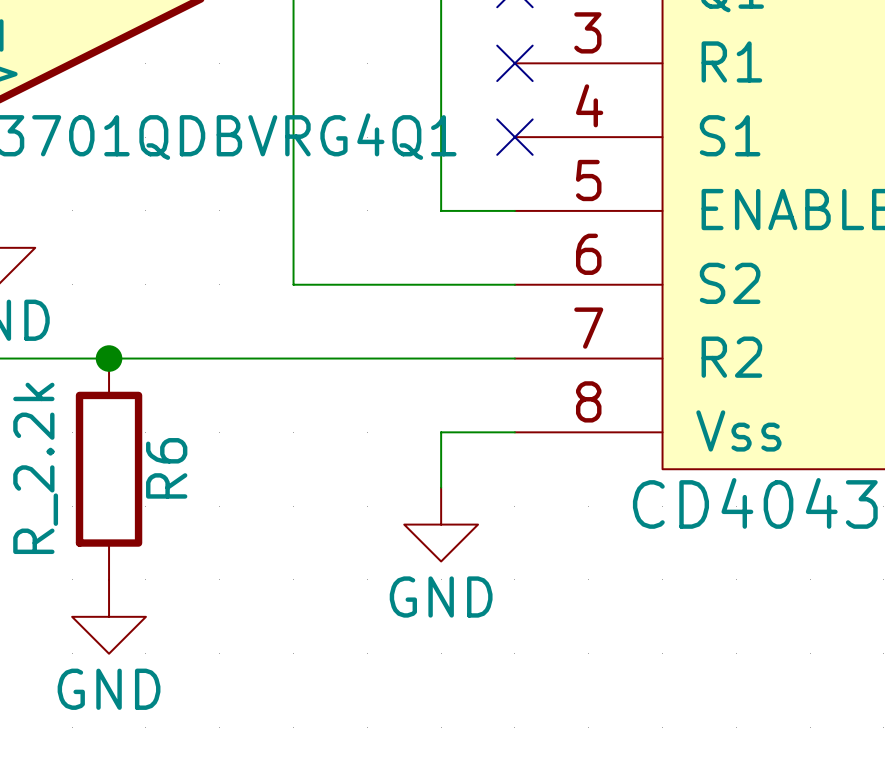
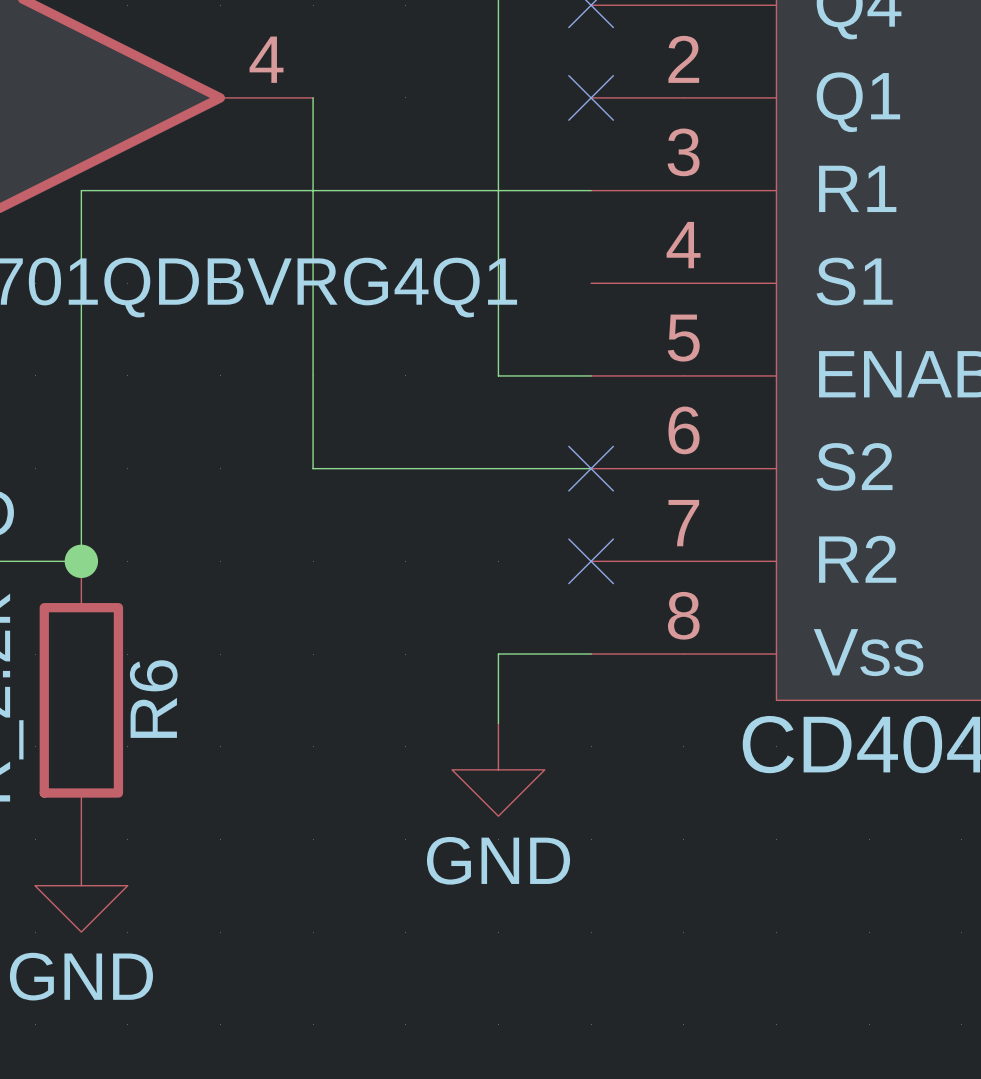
no-connect mark: (514, 63) -> none
no-connect mark: (514, 137) -> none
no-connect mark: none -> (591, 468)
wire: (109, 358) (514, 358) -> (81, 561) (81, 190) (591, 190)
no-connect mark: none -> (591, 561)

